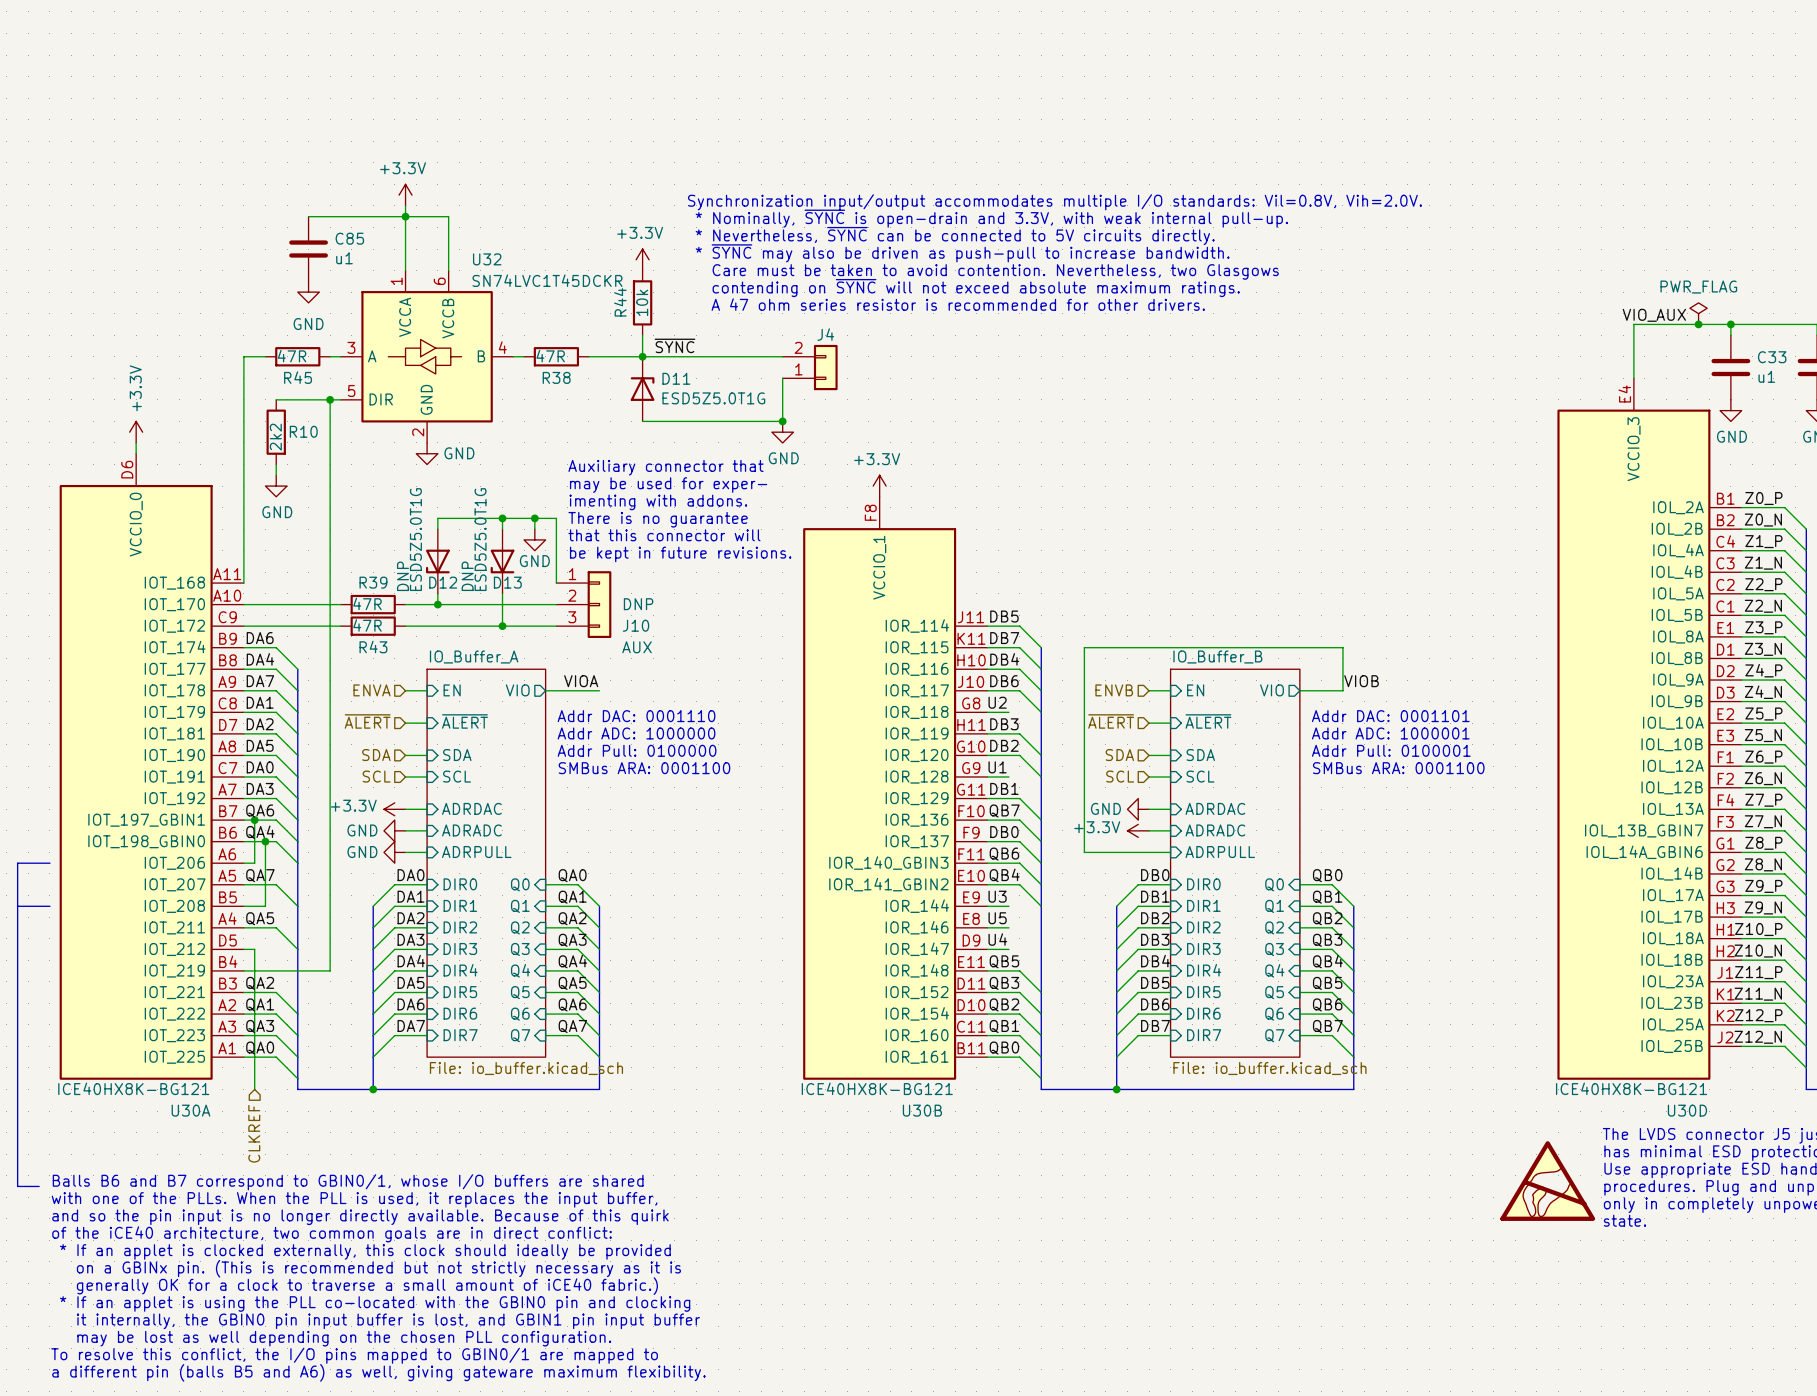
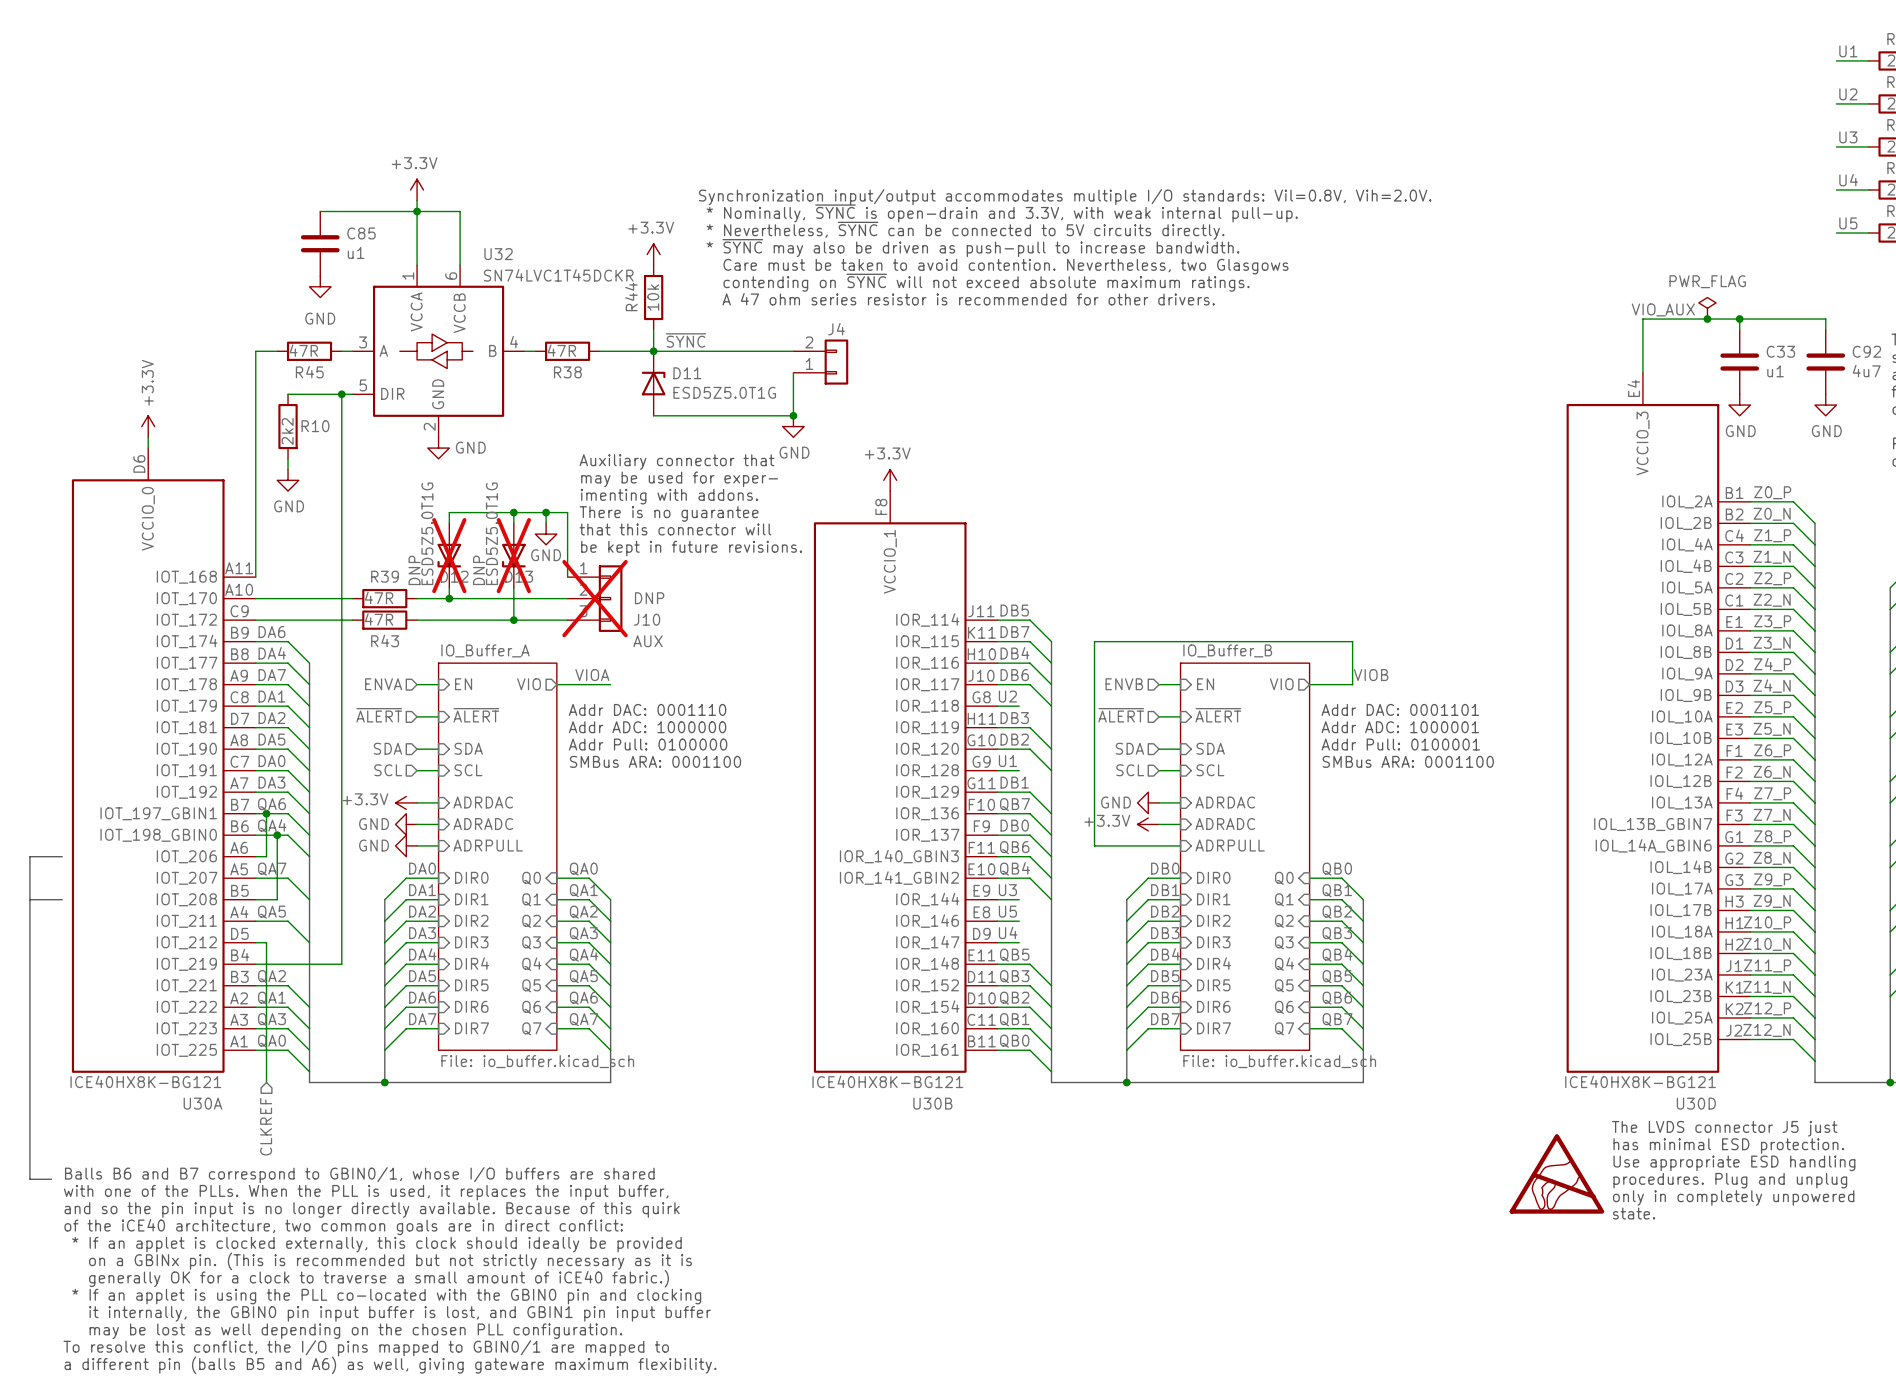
D12 do-not-place cross: none -> (449, 555)
D13 do-not-place cross: none -> (513, 555)
J10 do-not-place cross: none -> (595, 598)

